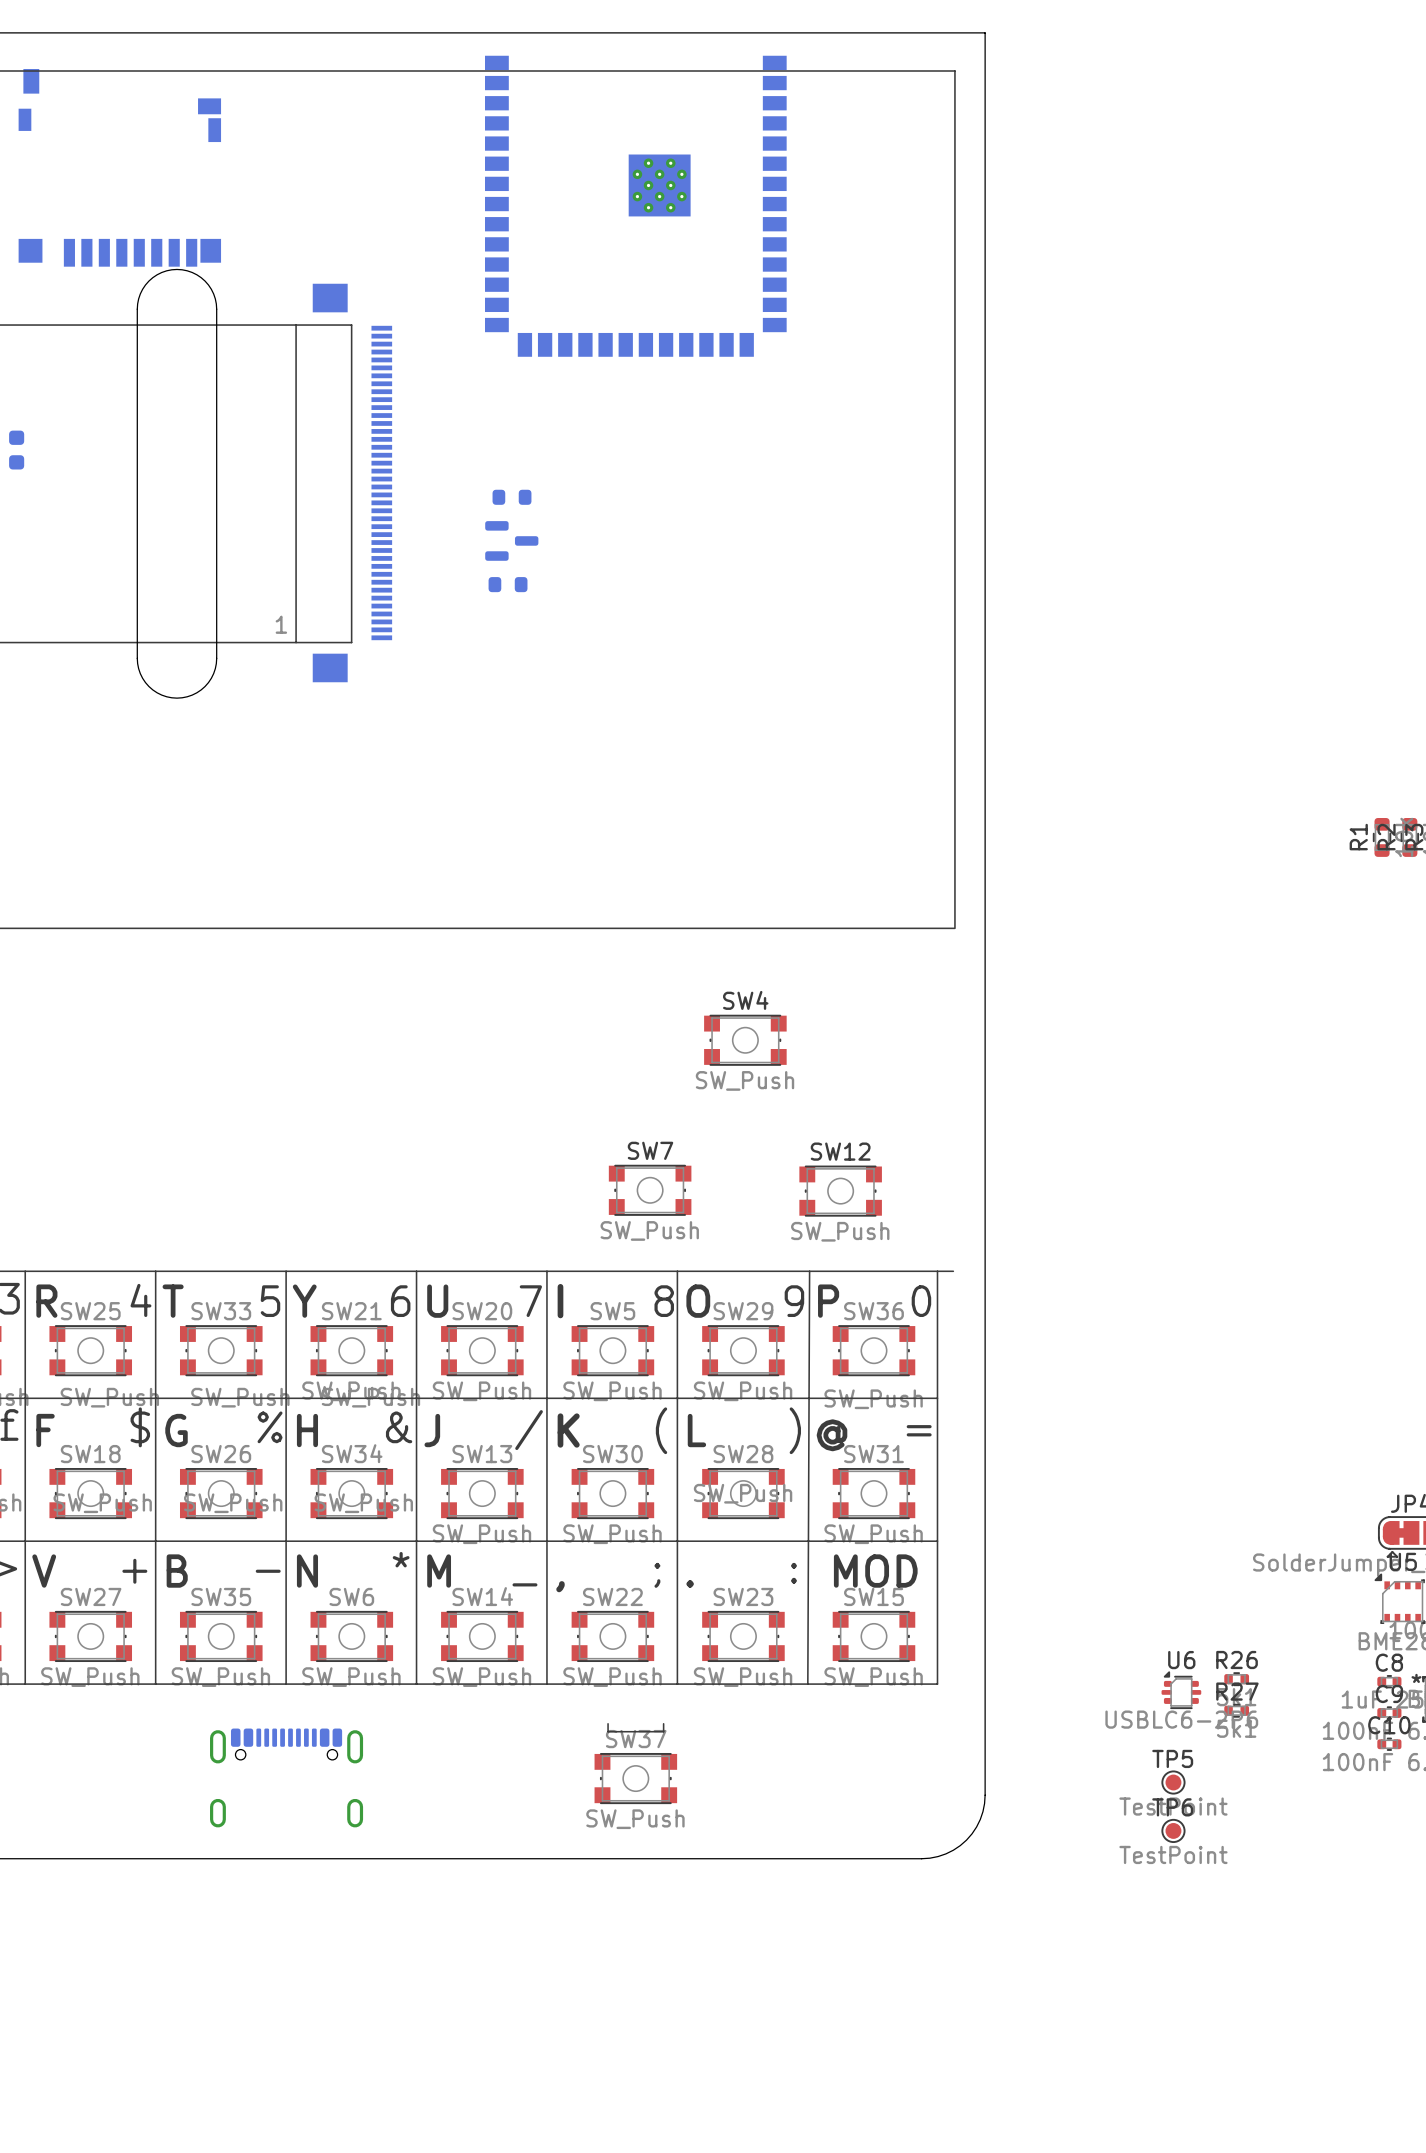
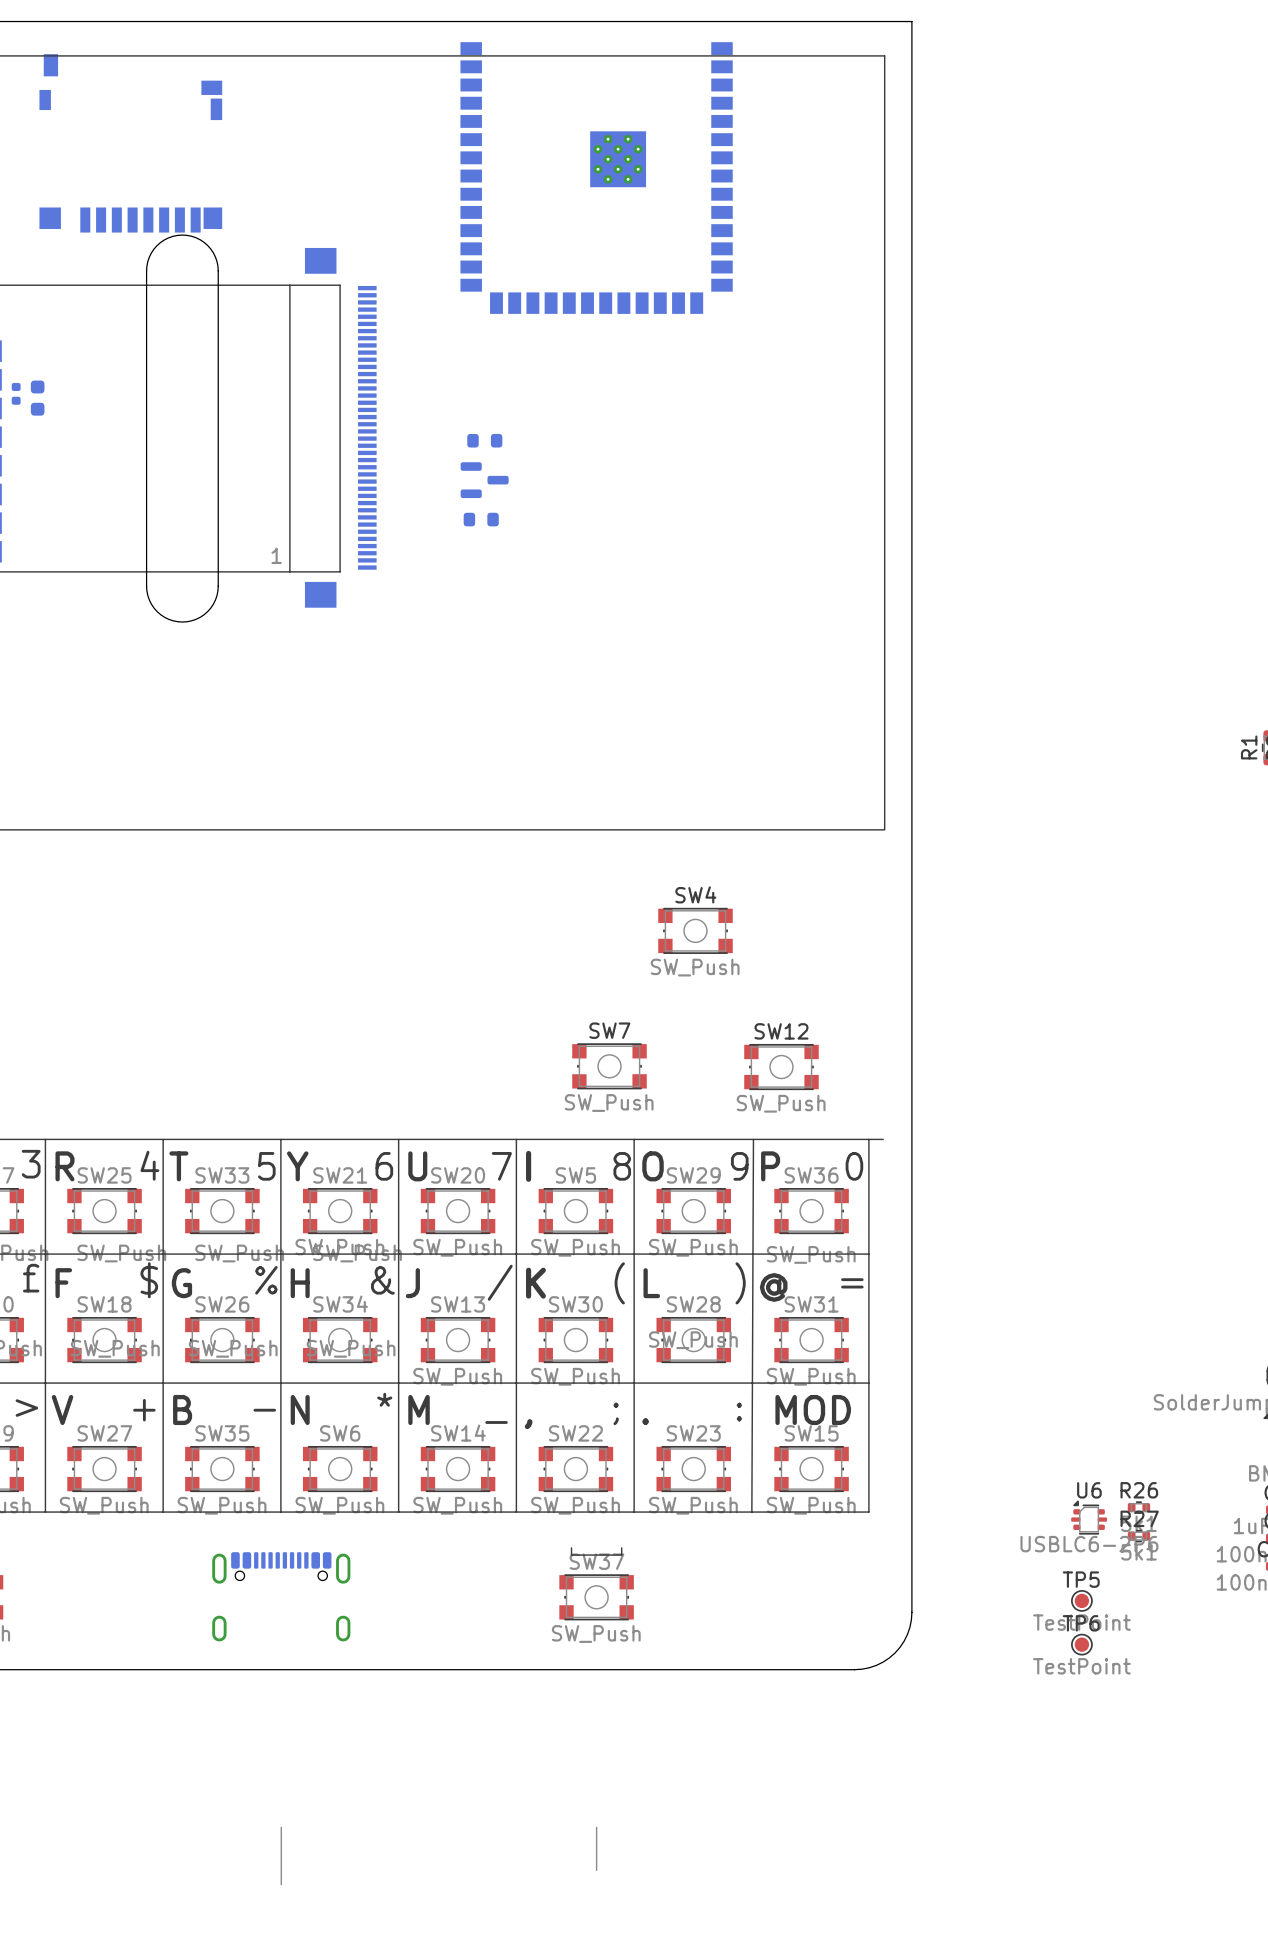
line: none -> (281, 1827) (281, 1884)
line: none -> (596, 1827) (596, 1870)

